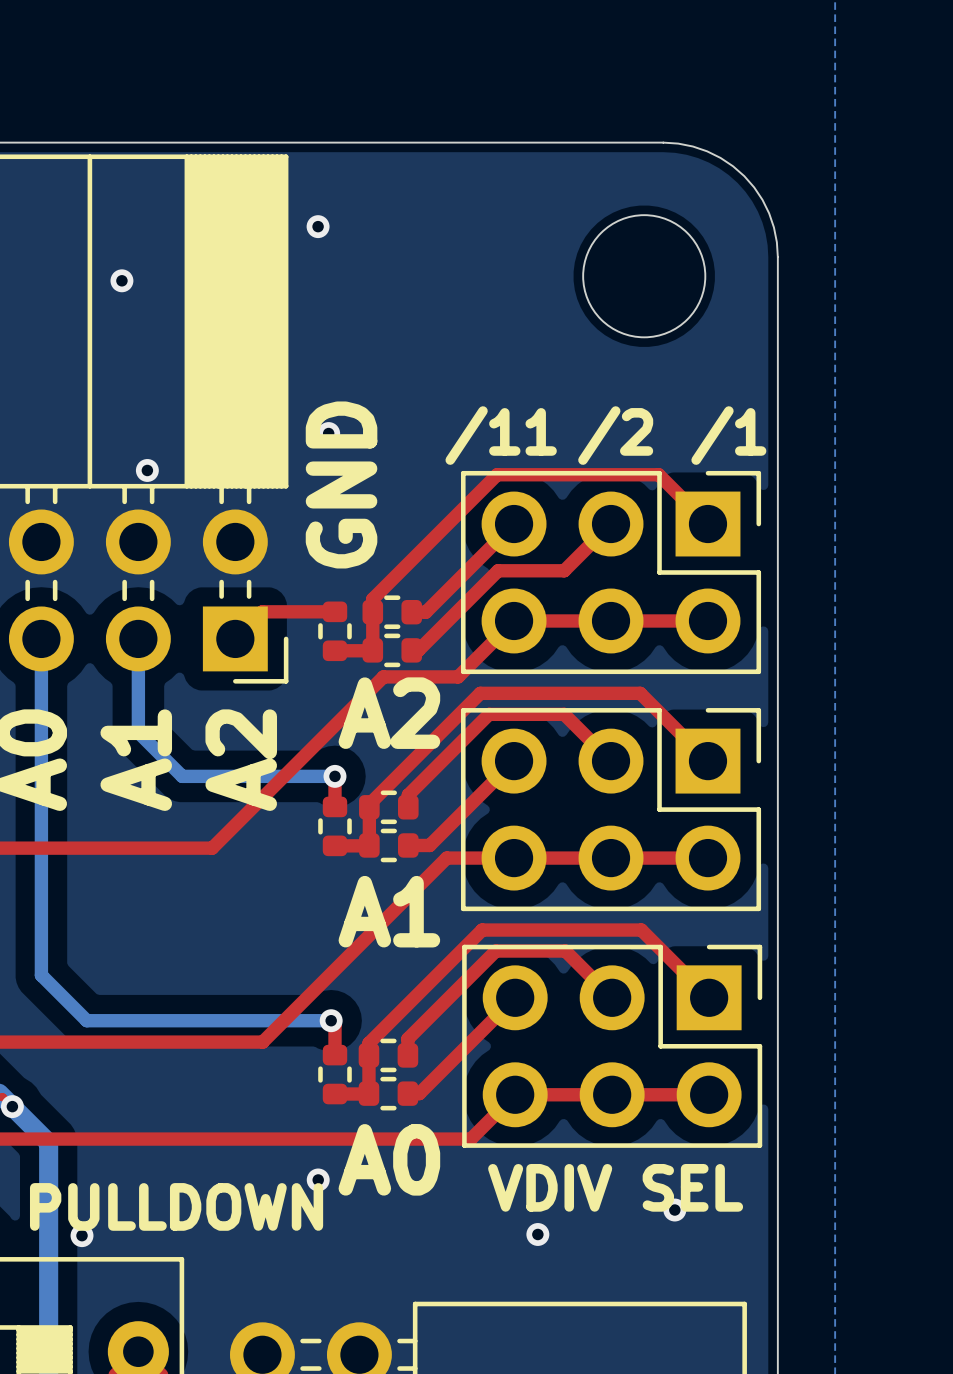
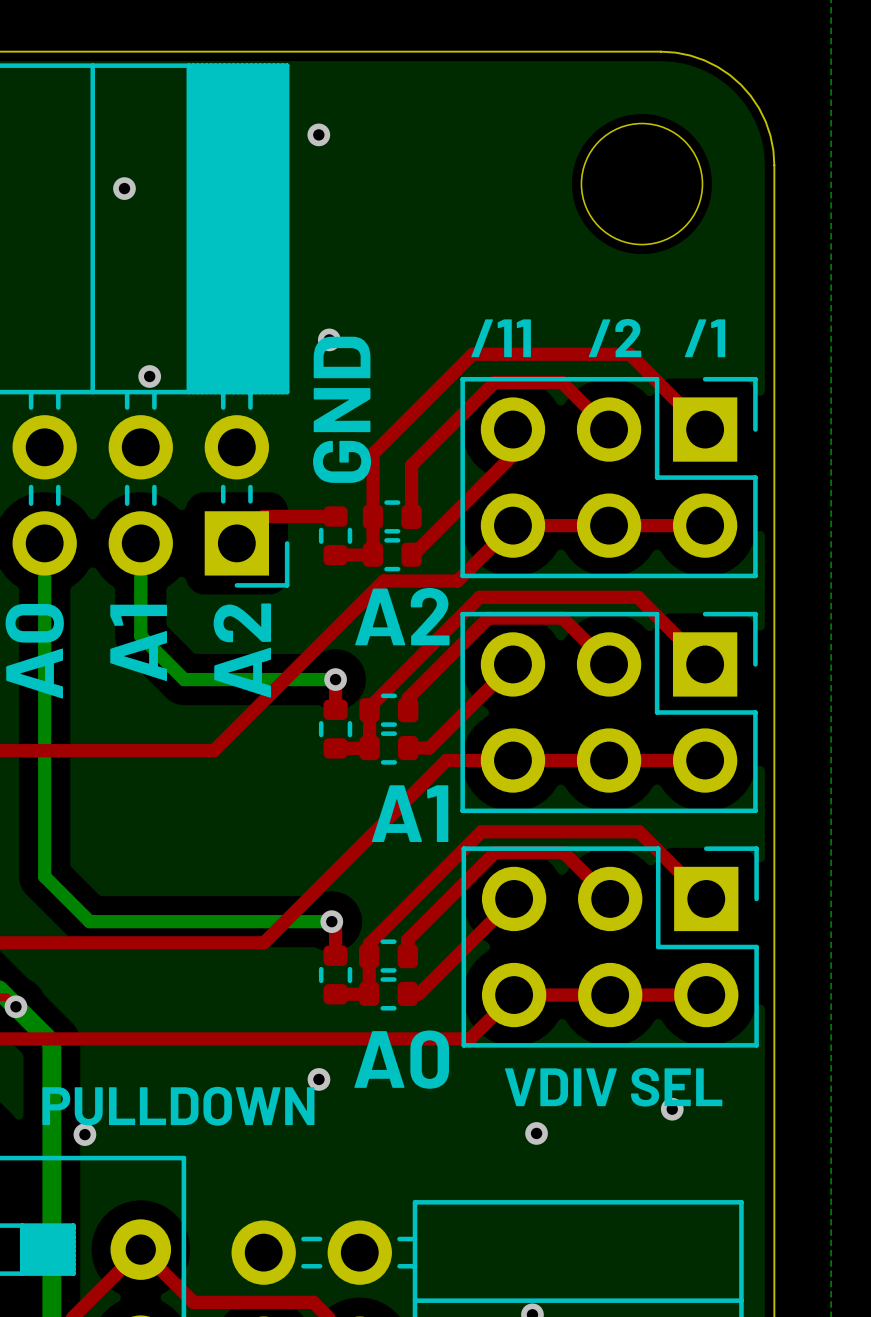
top track: (658, 474) (497, 474) (495, 476) -> (609, 429) (562, 382) (494, 382)
top track: none -> (656, 380) (629, 354) (472, 354) (373, 453) (373, 503)
top track: (514, 524) (425, 612) (411, 612) -> (512, 429) (512, 455) (415, 552)
top track: (611, 524) (564, 570) (498, 570) (418, 650) (411, 650) -> none
top track: (411, 560) (372, 599) -> (411, 465) (411, 516)

